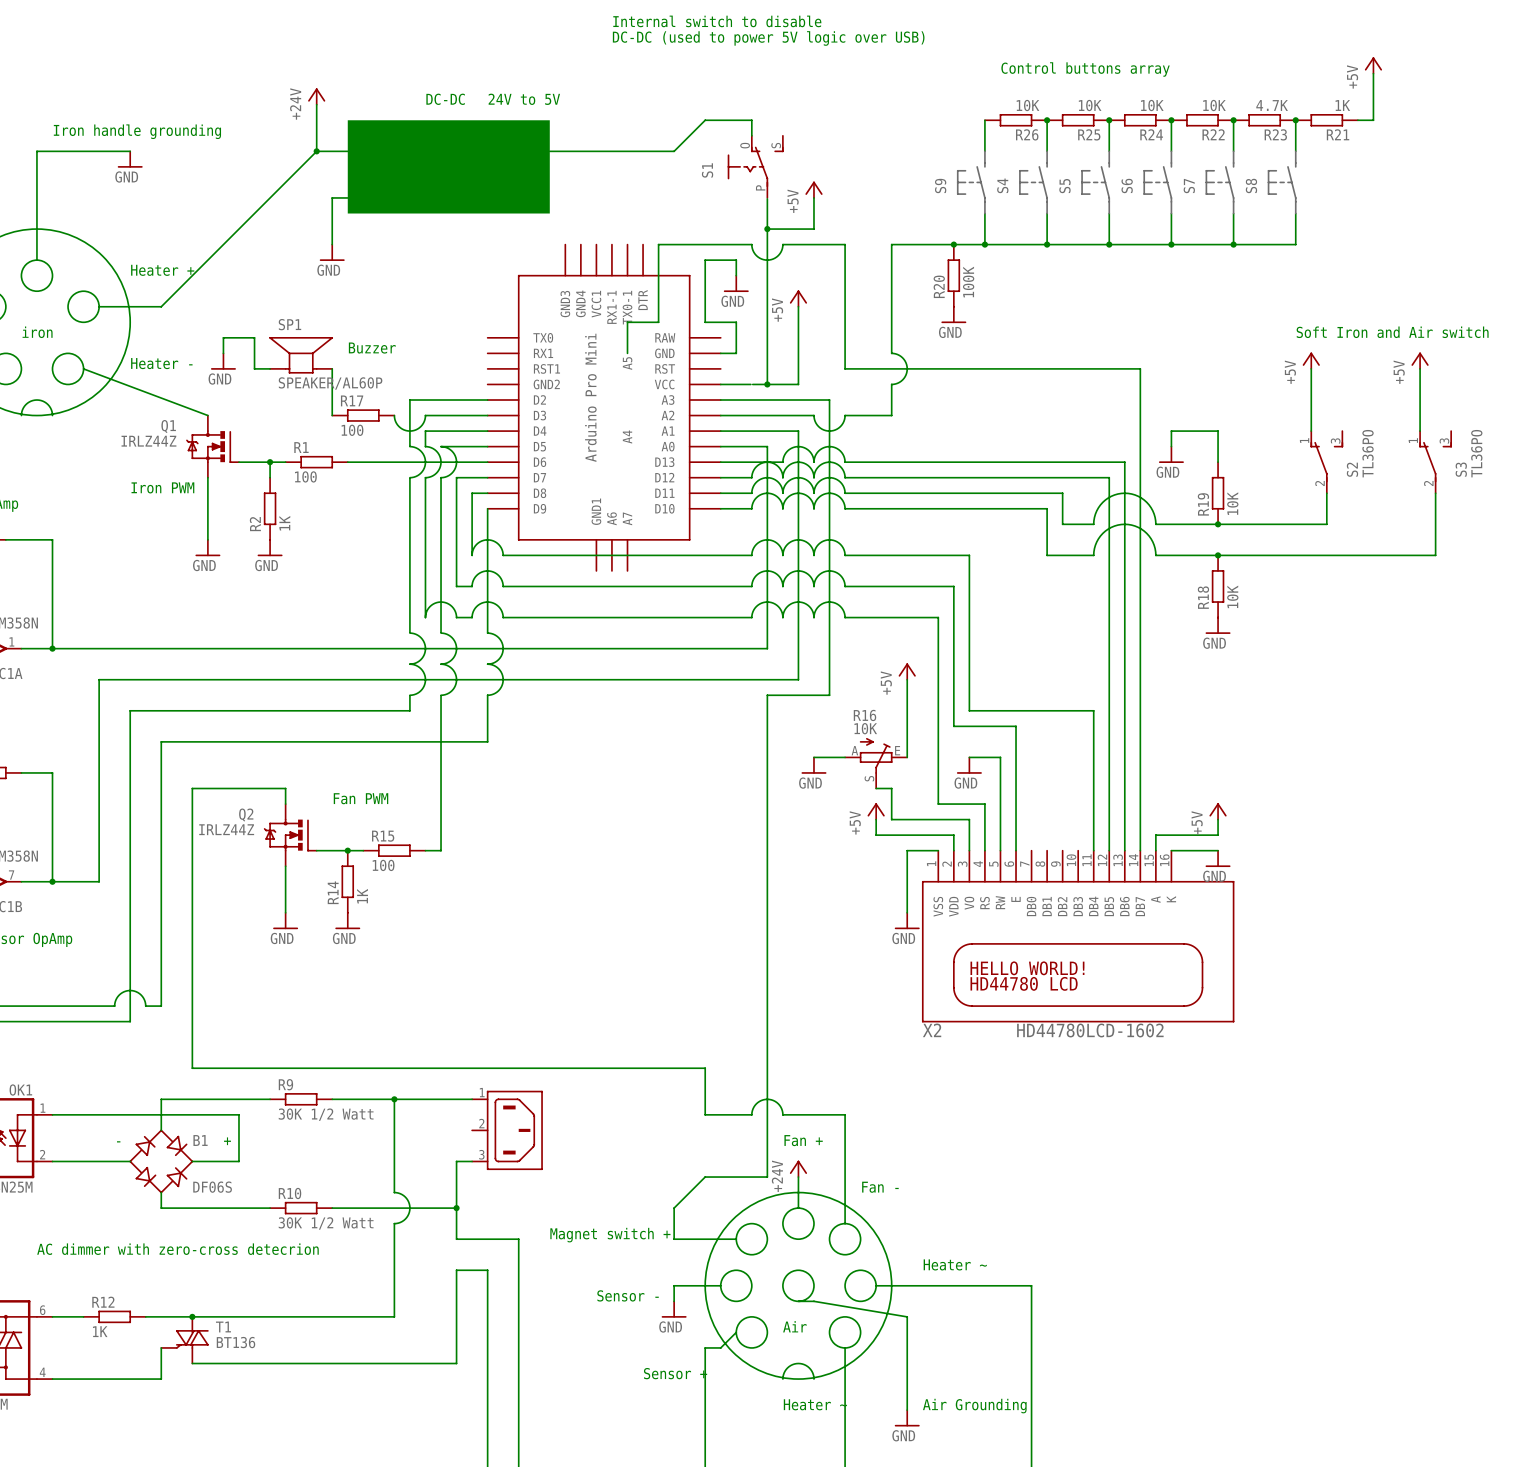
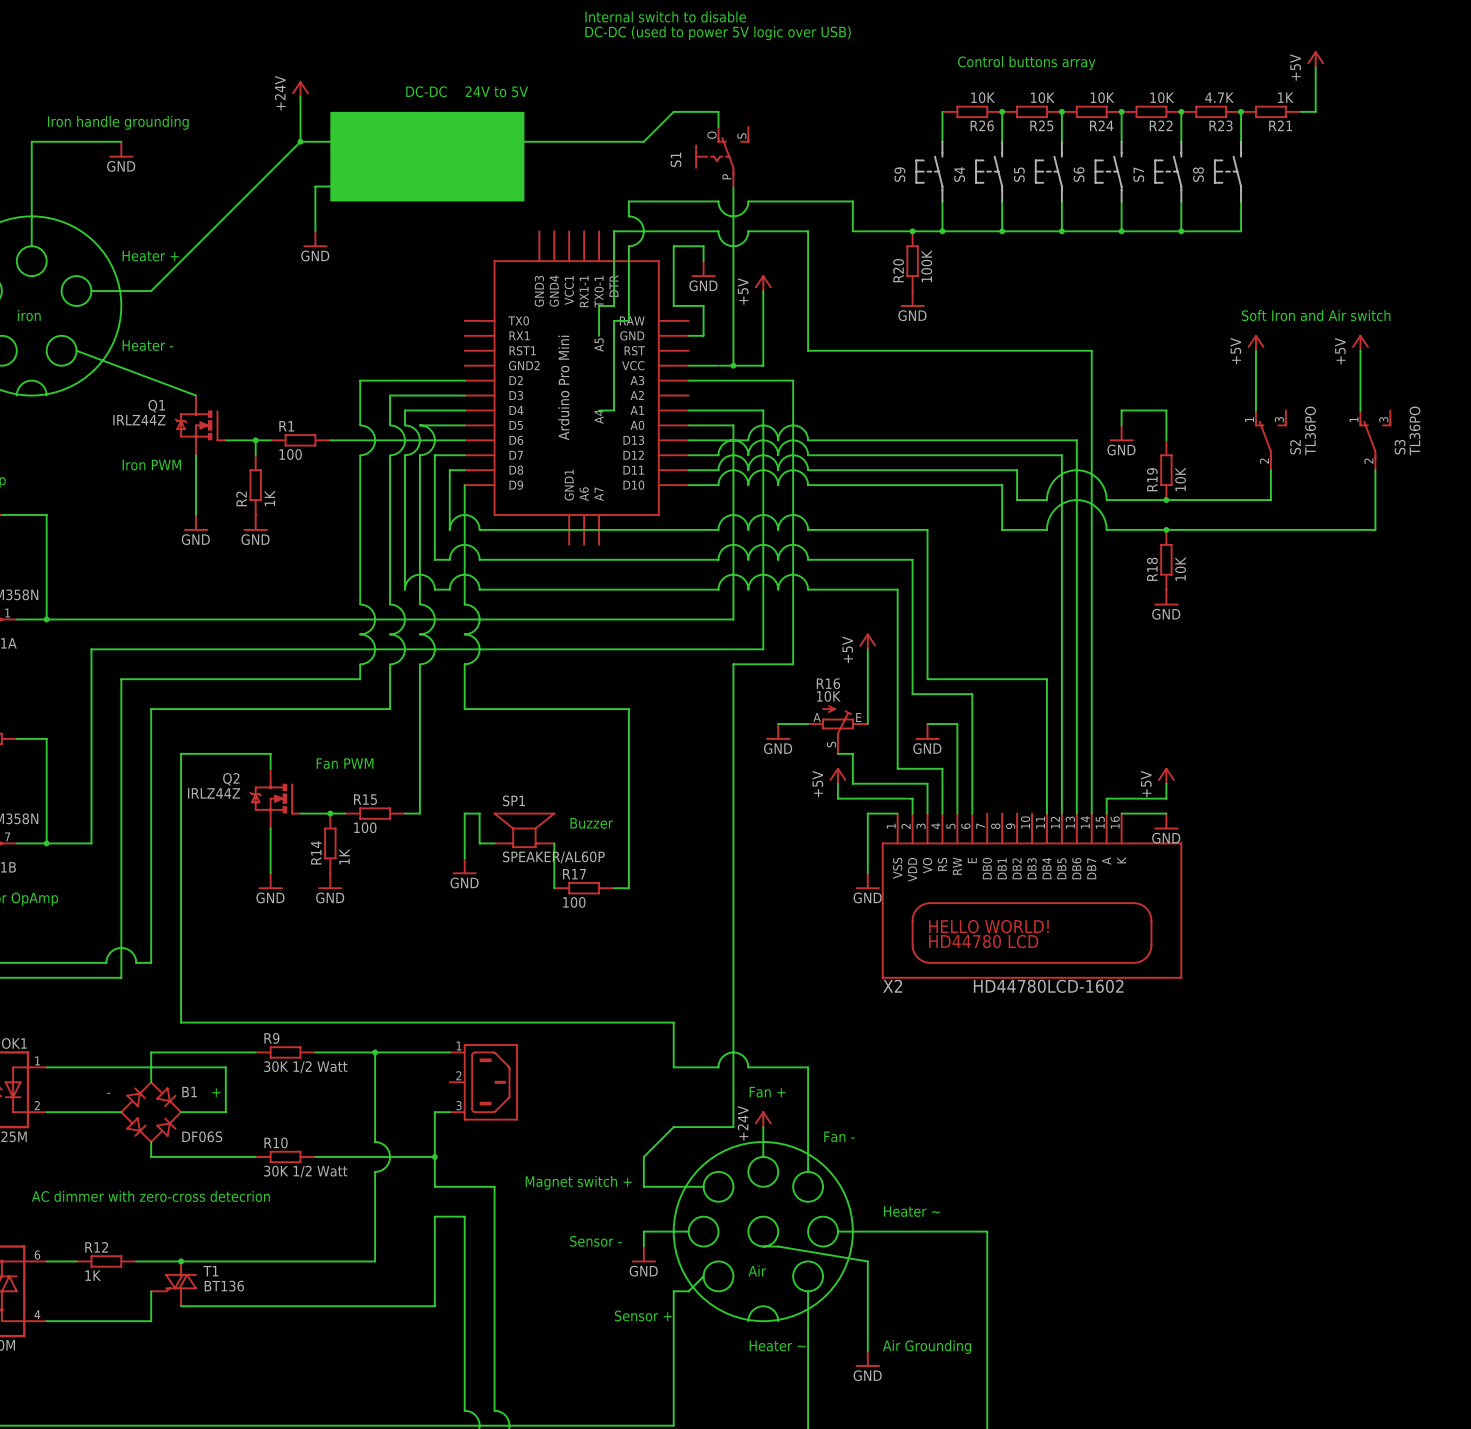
power symbol: +5V (813, 189) -> none
wire: (813, 197) (813, 229) (767, 229) -> none
junction: (767, 229) -> none
wire: (658, 244) (658, 260) -> (628, 231) (614, 231) (614, 305)
wire: (891, 244) (891, 353) (902, 357) (907, 368) (902, 379) (891, 384) (891, 415) (845, 415) (840, 426) (829, 431) (818, 426) (813, 415) (720, 415) -> (852, 231) (852, 201) (748, 201) (743, 212) (733, 216) (722, 212) (718, 201) (628, 201) (628, 216) (639, 220) (643, 231) (639, 241) (628, 246)
wire: (643, 322) (658, 322) -> (599, 410) (614, 410) (614, 320) (628, 320) (628, 305)
text: Buzzer (372, 348) -> none
wire: (223, 353) (223, 337) (254, 337) (254, 368) (270, 368) -> none
SP1 position: (301, 355) -> (524, 830)
power symbol: GND (223, 361) -> none
wire: (332, 368) (332, 415) -> none
wire: (409, 400) (409, 415) -> (390, 380) (360, 380) (360, 424)
R17 position: (363, 415) -> (584, 888)
wire: (394, 415) (398, 426) (409, 431) (420, 426) (425, 415) -> (390, 395) (404, 395)
wire: none -> (360, 425) (370, 429) (375, 440) (370, 450) (360, 455)
wire: none -> (360, 456) (360, 603)
wire: none -> (360, 604) (370, 608) (375, 619) (370, 630) (360, 634) (365, 635) (372, 640) (374, 645) (374, 653) (369, 661) (360, 664)
wire: (378, 710) (409, 710) -> (360, 679) (360, 665)
wire: (409, 741) (487, 741) -> (390, 709) (390, 679)
wire: none -> (464, 709) (628, 709) (628, 888) (614, 888)
text: none -> Buzzer (591, 823)
wire: none -> (494, 843) (479, 843) (479, 813) (464, 813) (464, 858)
wire: none -> (554, 843) (554, 888)
power symbol: none -> GND (464, 866)

